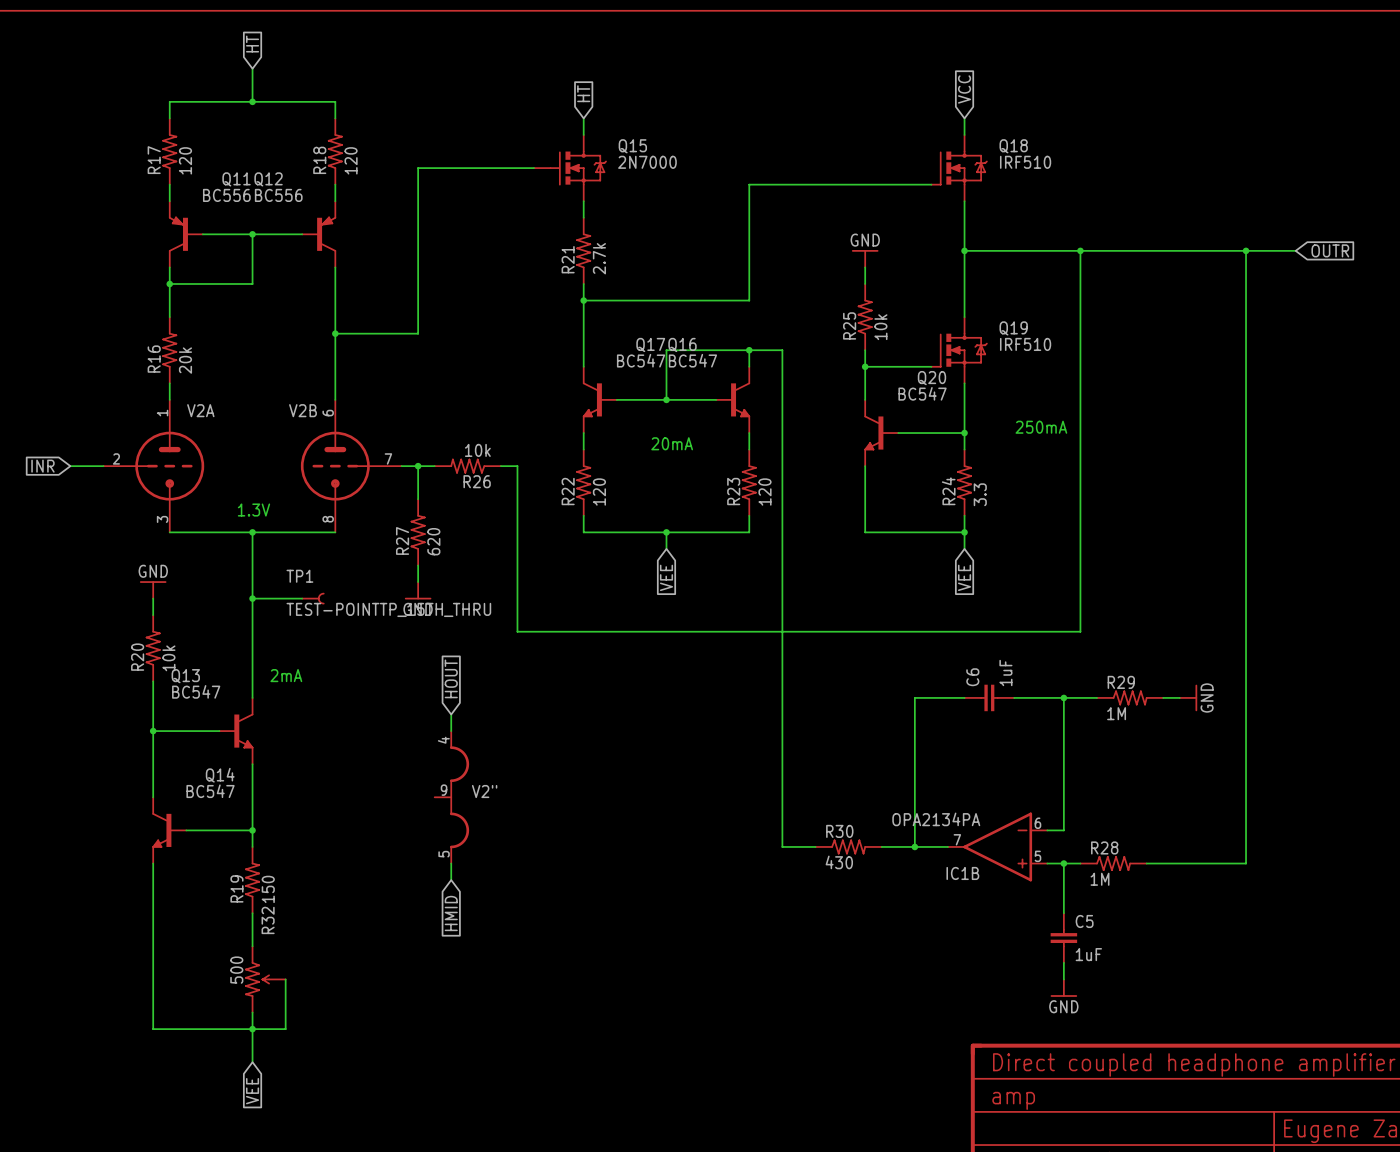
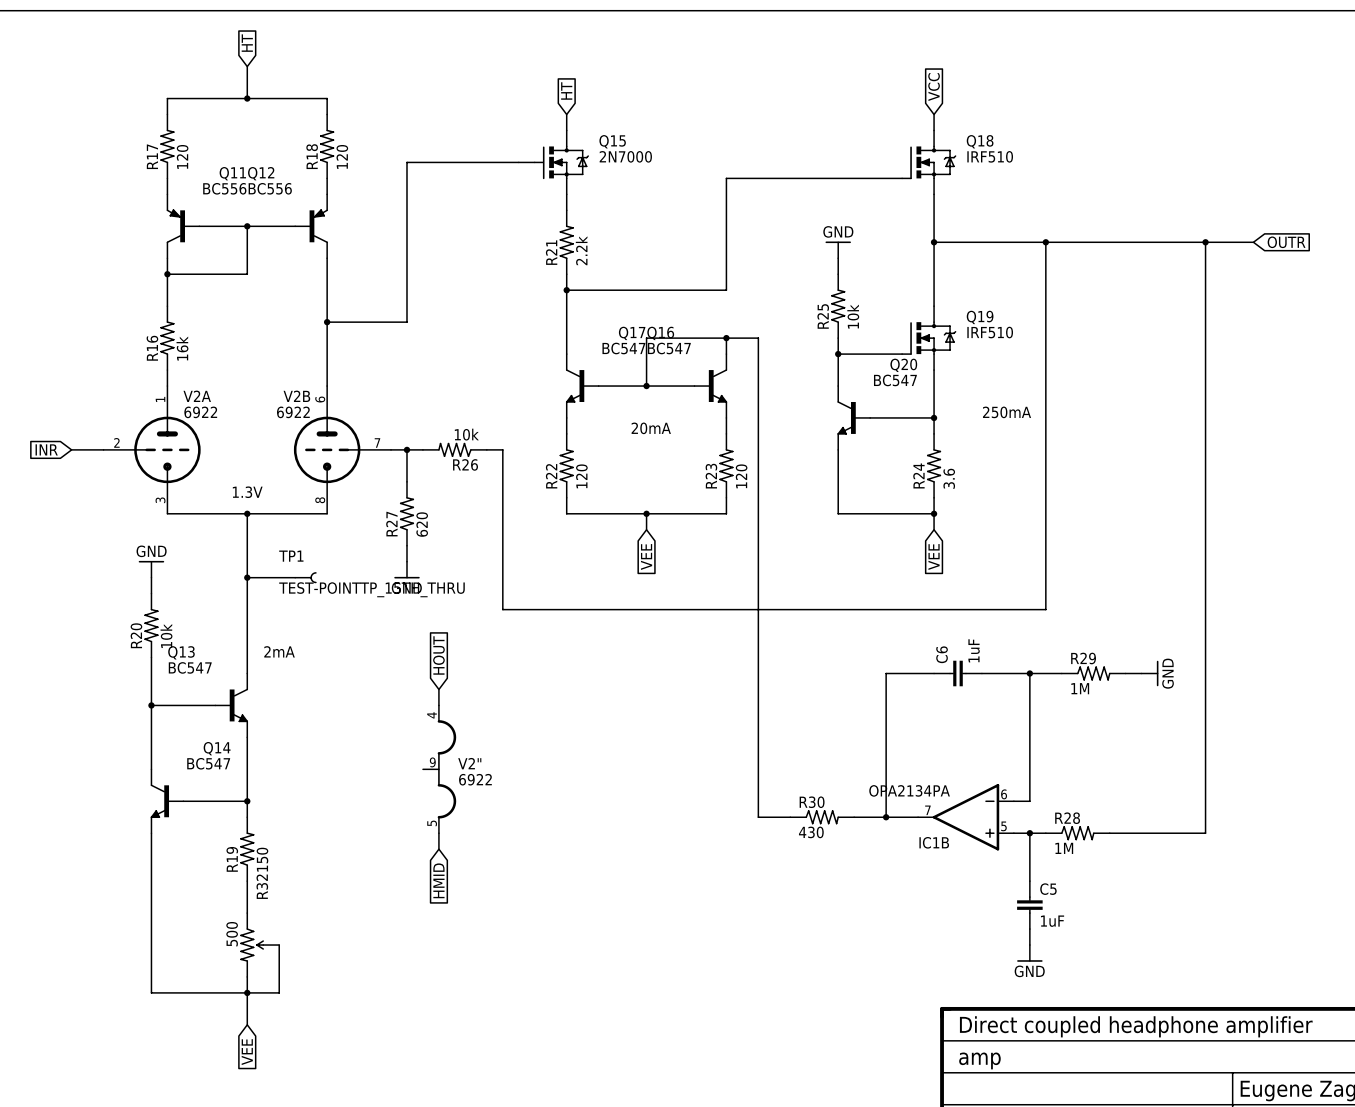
R21 value: 2.7k (599, 258) -> 2.2k (581, 250)
R16 value: 20k (185, 360) -> 16k (182, 348)
V2A value: none -> 6922 (200, 412)
V2B value: none -> 6922 (293, 412)
R24 value: 3.3 (980, 494) -> 3.6 (949, 478)
V2" value: none -> 6922 (475, 779)

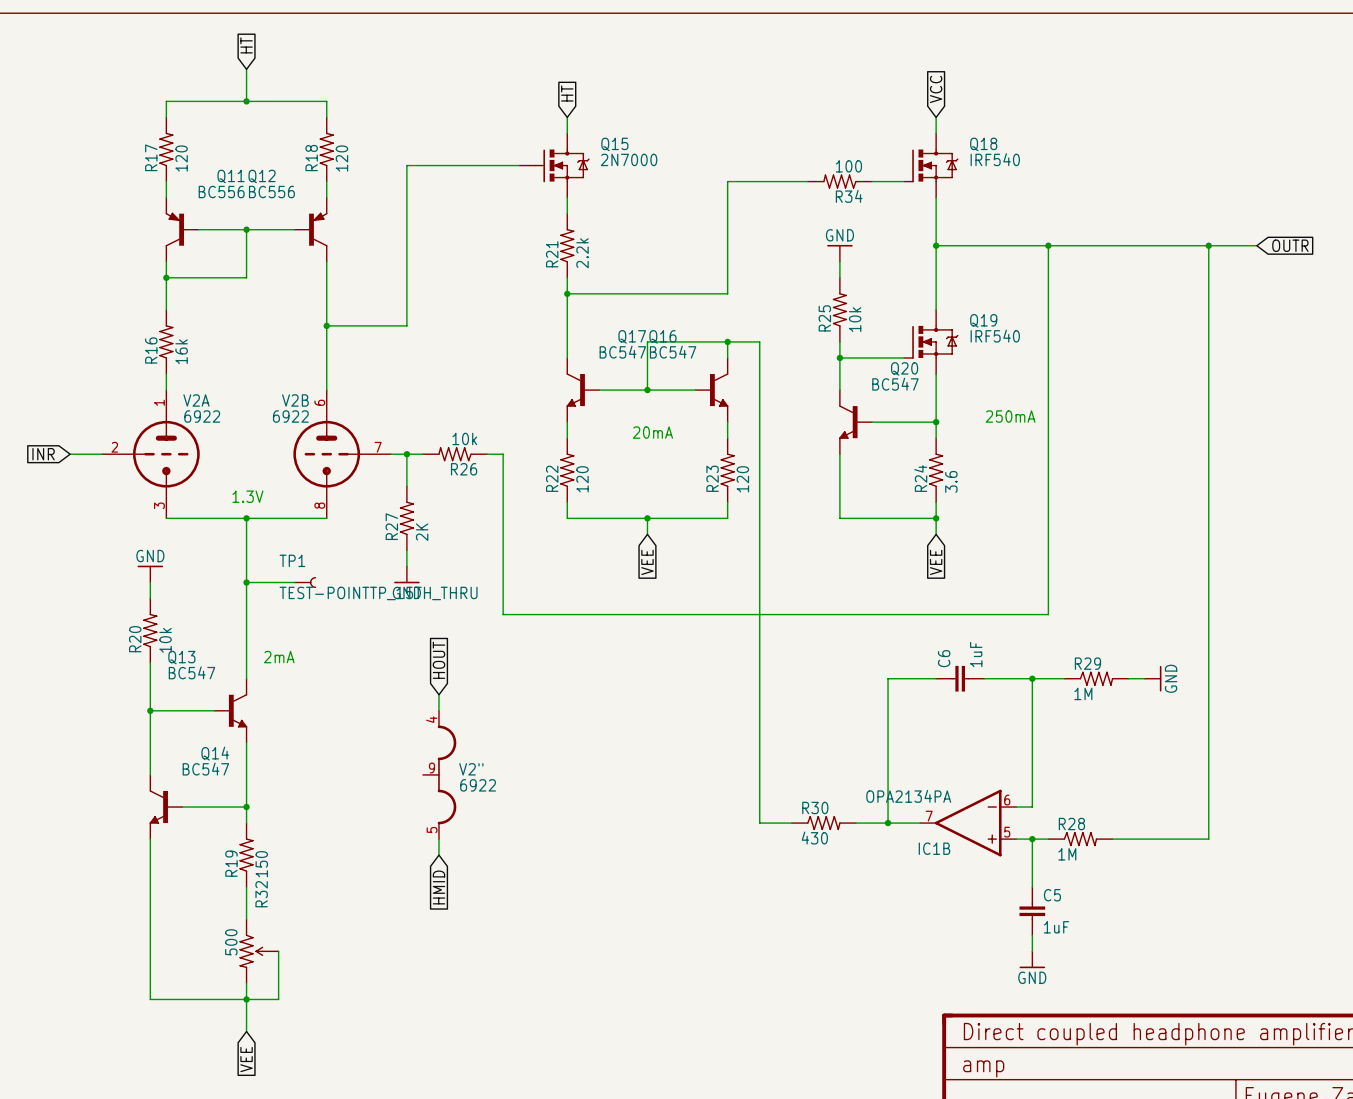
Q18 value: IRF510 (990, 156) -> IRF540 (995, 159)
R34: none -> 100 (839, 181)
Q19 value: IRF510 (990, 332) -> IRF540 (995, 336)
R27 value: 620 (422, 524) -> 2K (422, 532)

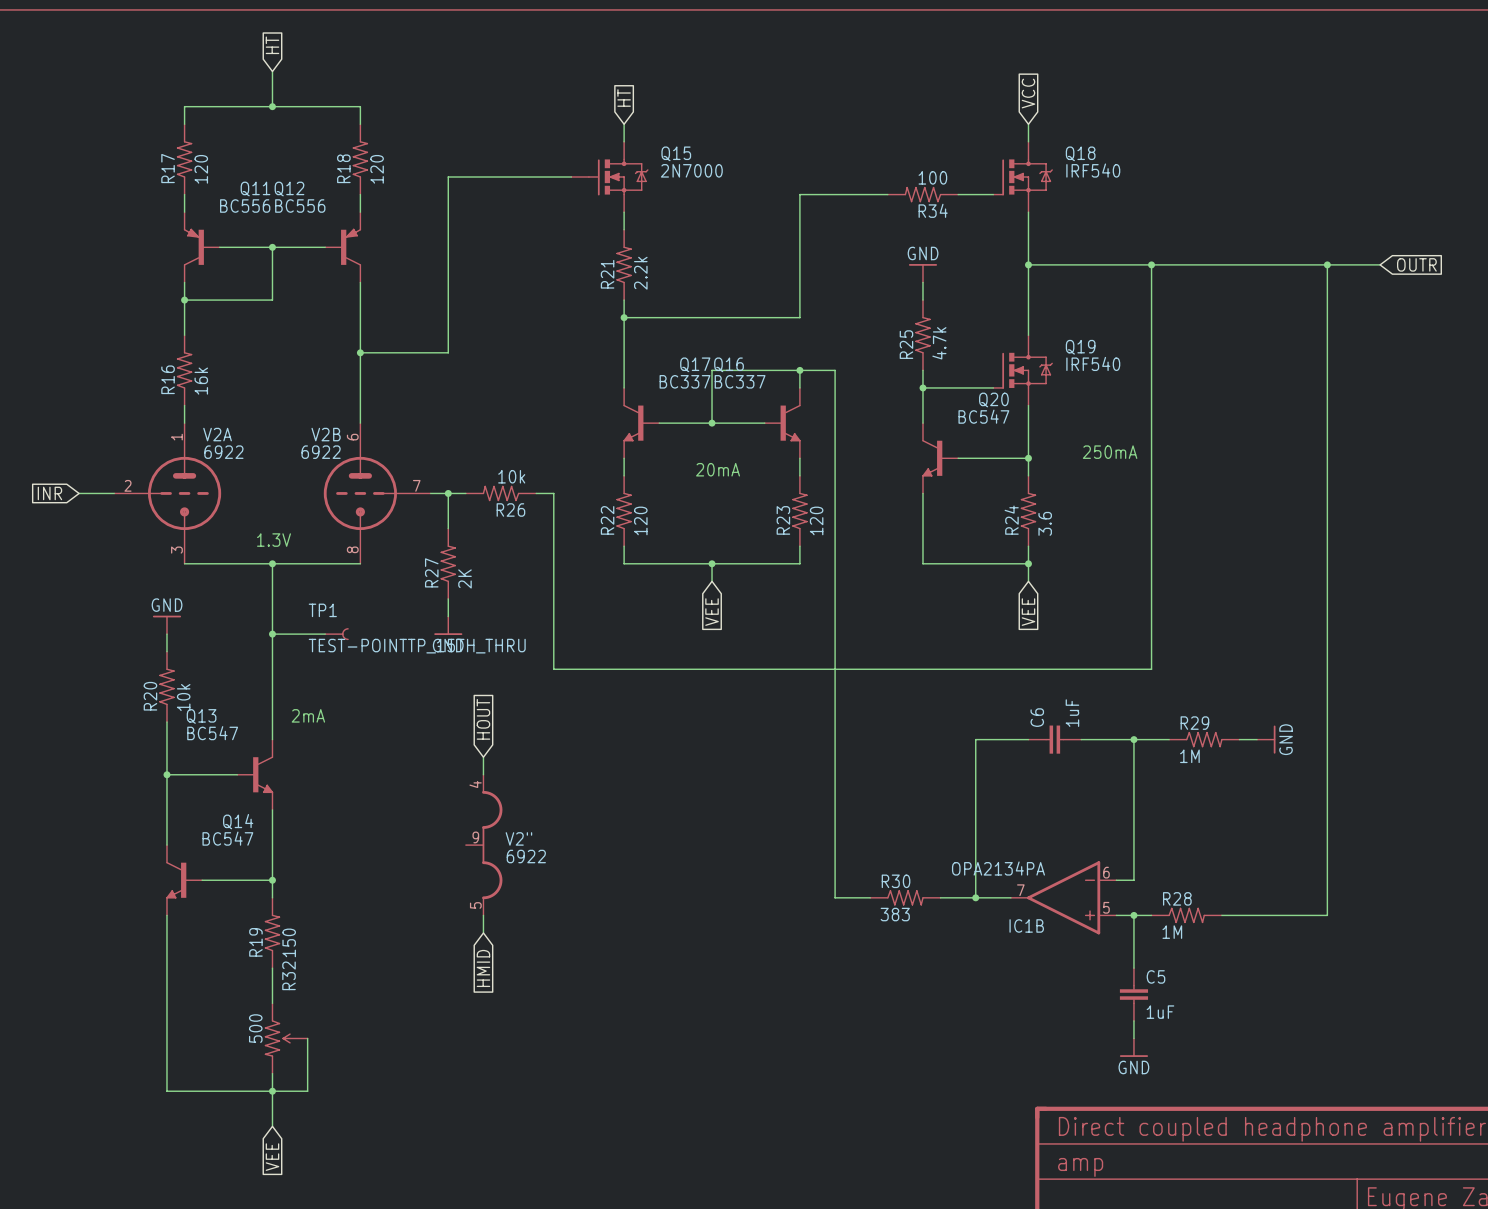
R25 value: 10k (855, 319) -> 4.7k (939, 343)
Q17 value: BC547 (622, 352) -> BC337 (684, 381)
Q16 value: BC547 (673, 352) -> BC337 (740, 381)
R30 value: 430 (814, 838) -> 383 (895, 914)

